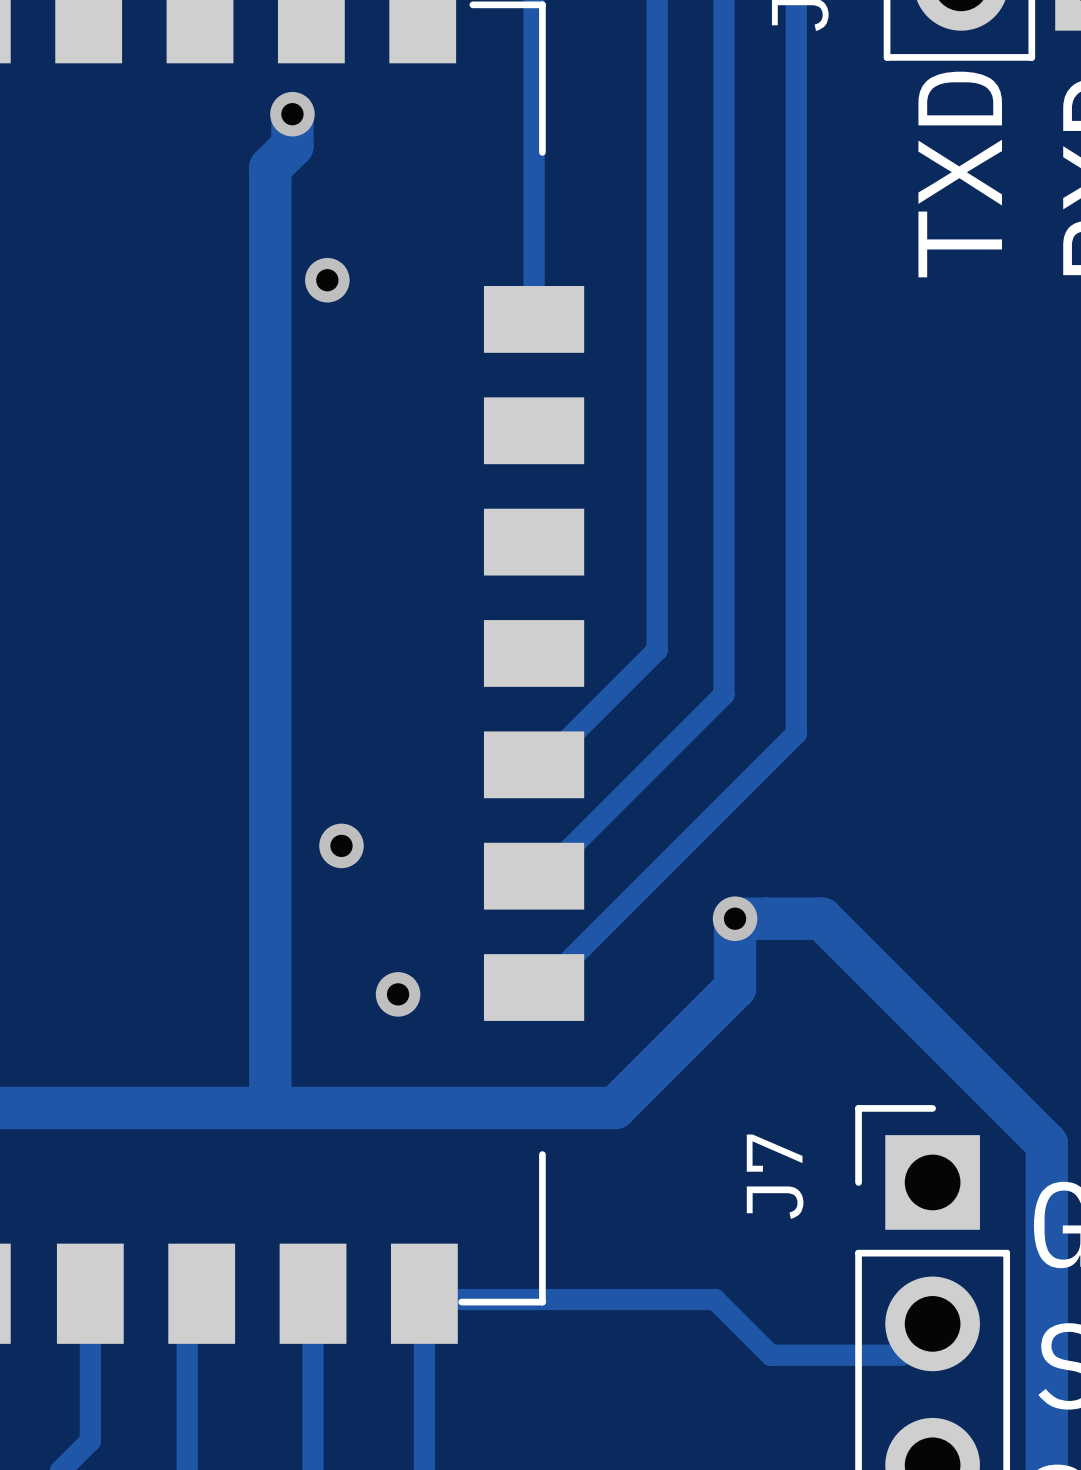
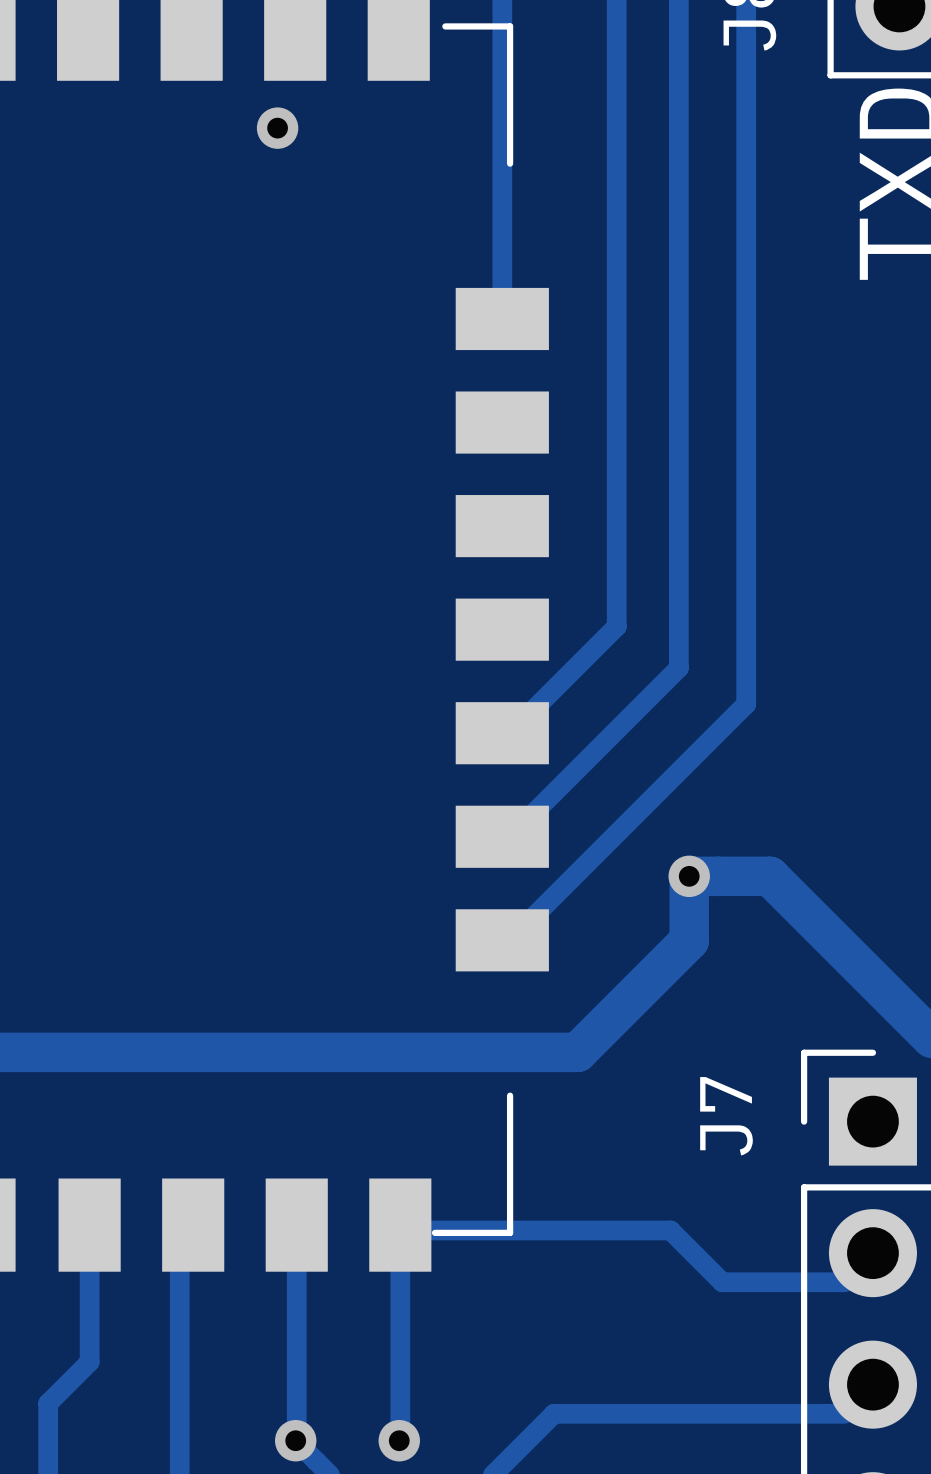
track: (292, 114) (292, 145) (270, 167) (270, 1108) -> none
via: (327, 280) -> none
via: (341, 845) -> none
via: (398, 994) -> none

